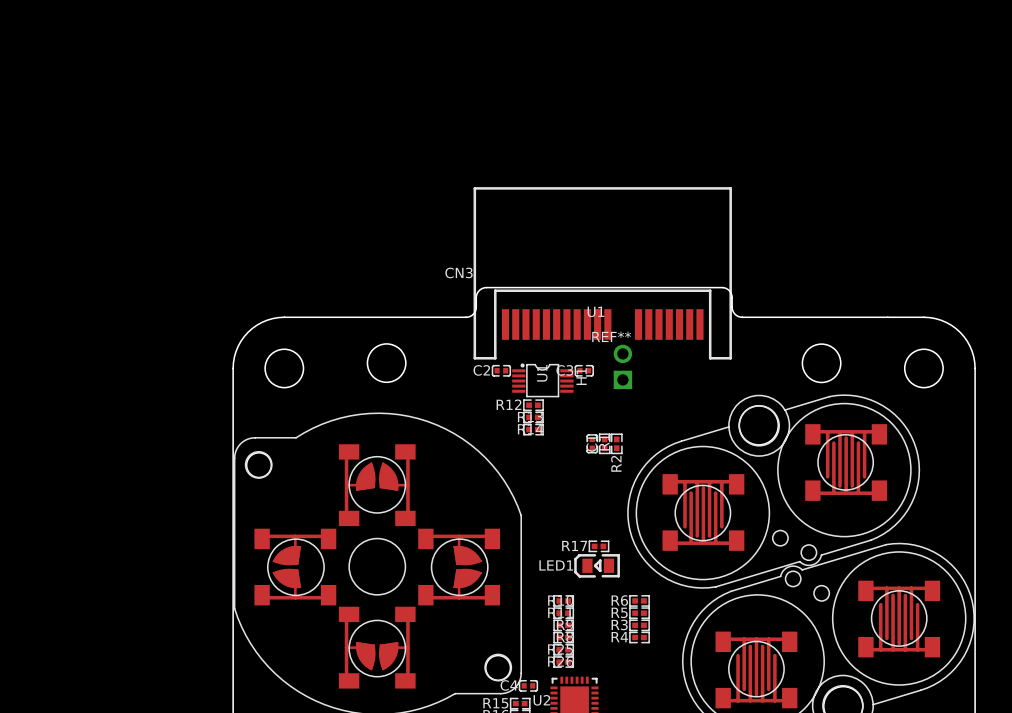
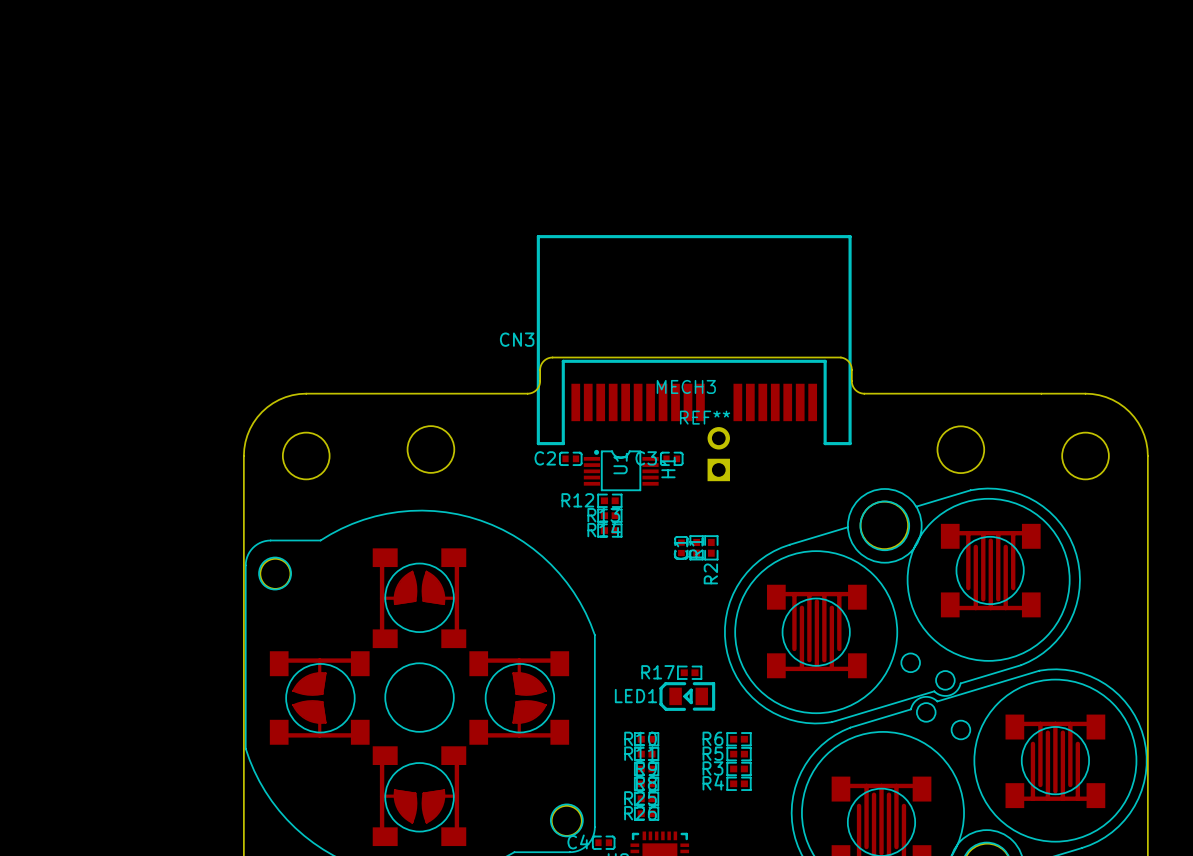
U1 name: U1 (595, 311) -> MECH3 (686, 386)

